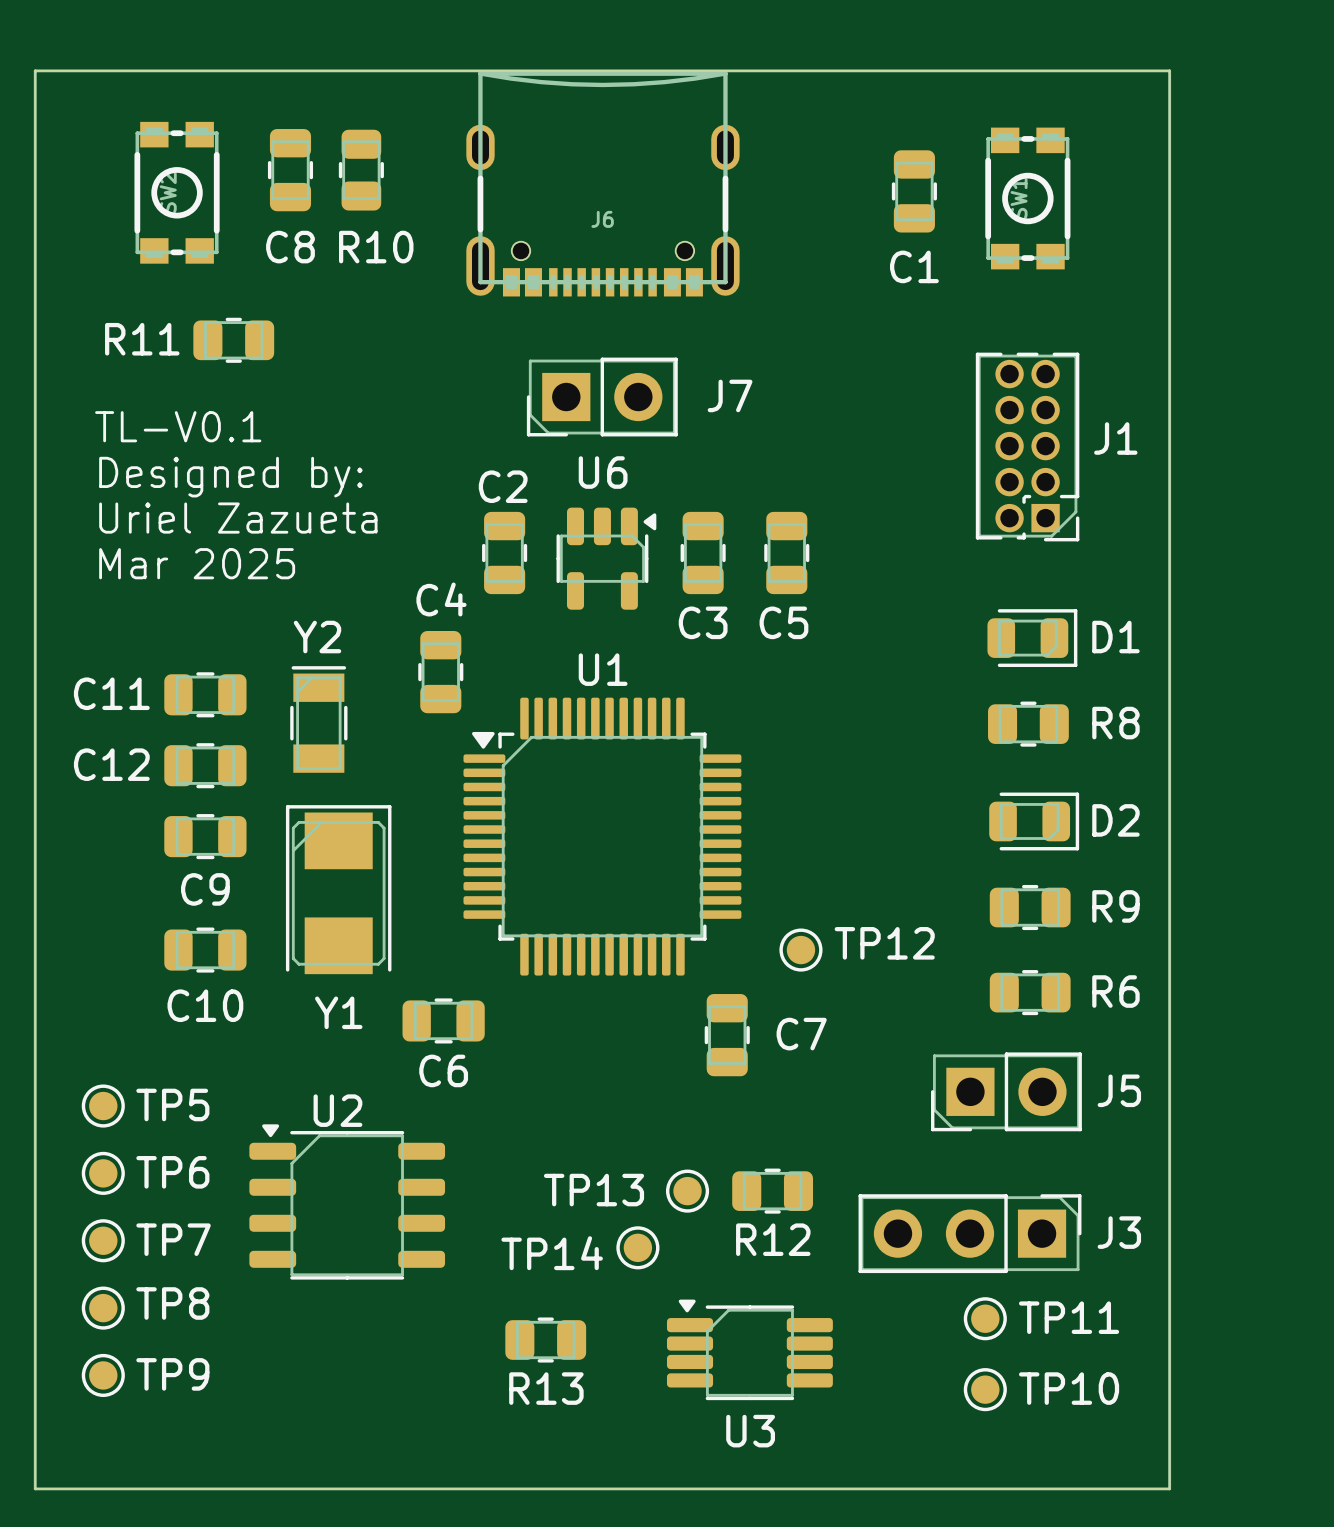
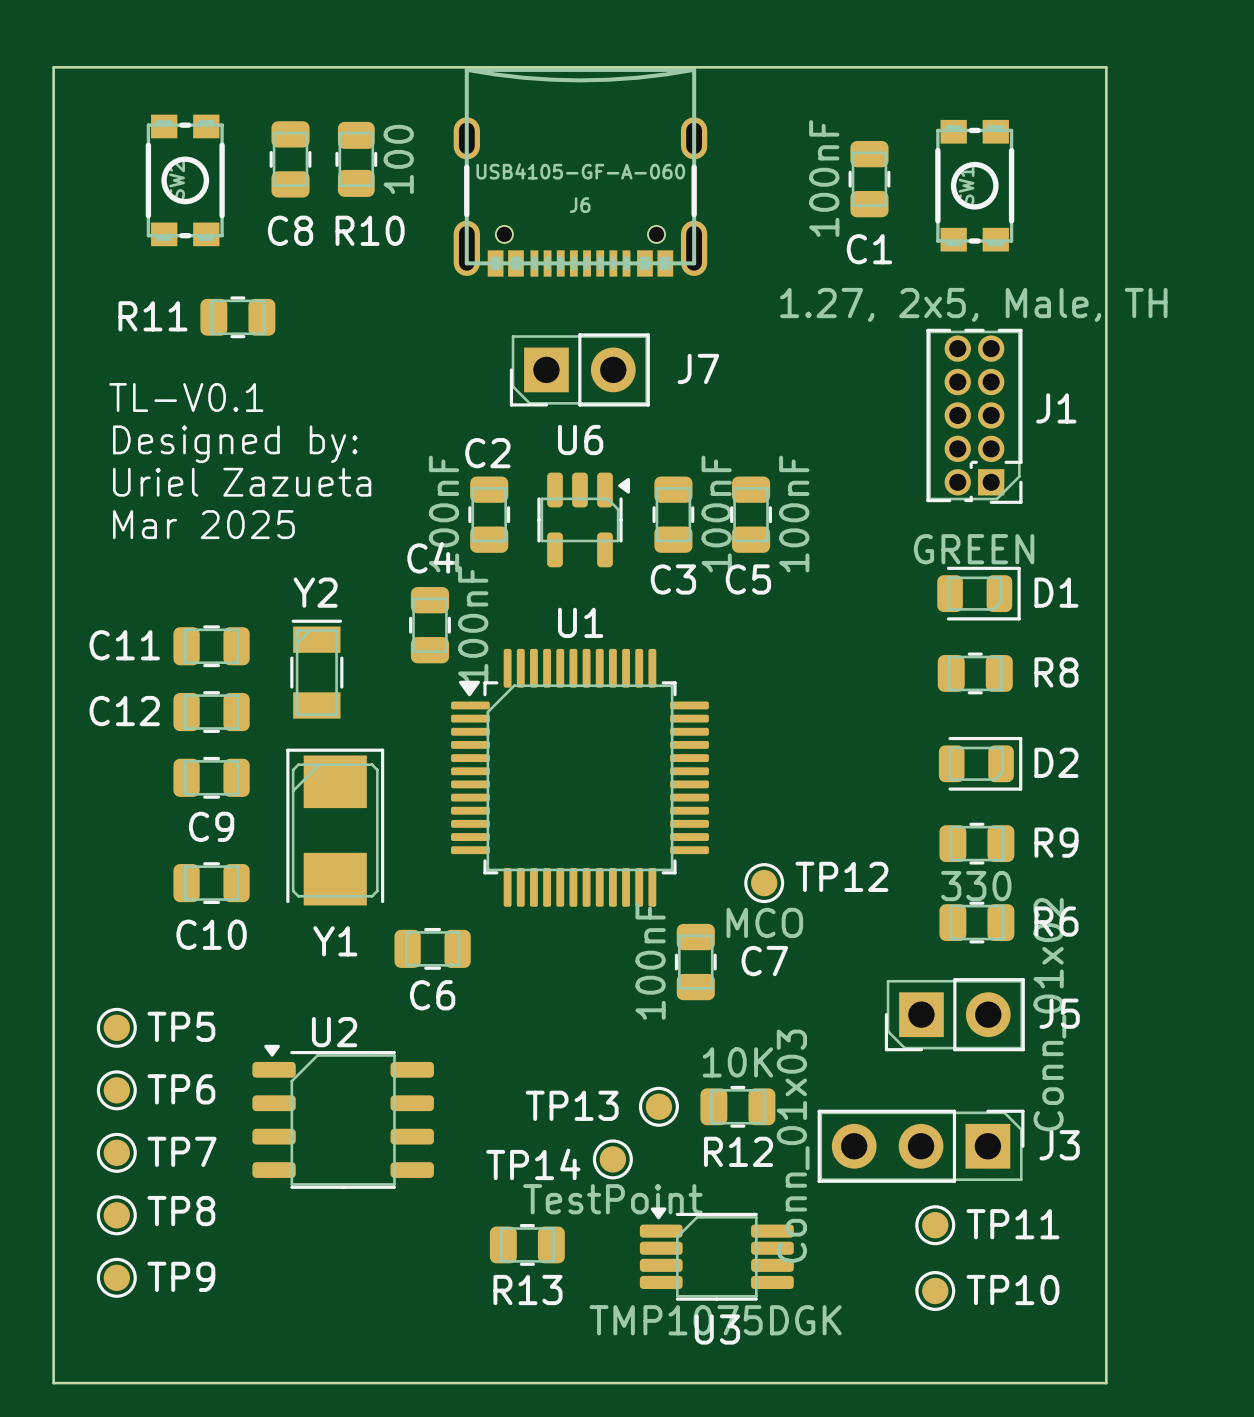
R10 value: none -> 100 (398, 159)
J6 value: none -> USB4105-GF-A-060 (580, 171)
C1 value: none -> 100nF (824, 178)
J1 value: none -> 1.27, 2x5, Male, TH (973, 304)
C2 value: none -> 100nF (444, 514)
C3 value: none -> 100nF (716, 514)
C5 value: none -> 100nF (794, 514)
D1 value: none -> GREEN (974, 549)
C4 value: none -> 100nF (473, 624)
R9 value: none -> 330 (976, 886)
TP12 value: none -> MCO (764, 922)
C7 value: none -> 100nF (650, 961)
J5 value: none -> Conn_01x02 (1049, 1014)
R12 value: none -> 10K (737, 1062)
J3 value: none -> Conn_01x03 (793, 1146)
TP14 value: none -> TestPoint (612, 1199)
U3 value: none -> TMP1075DGK (715, 1320)

